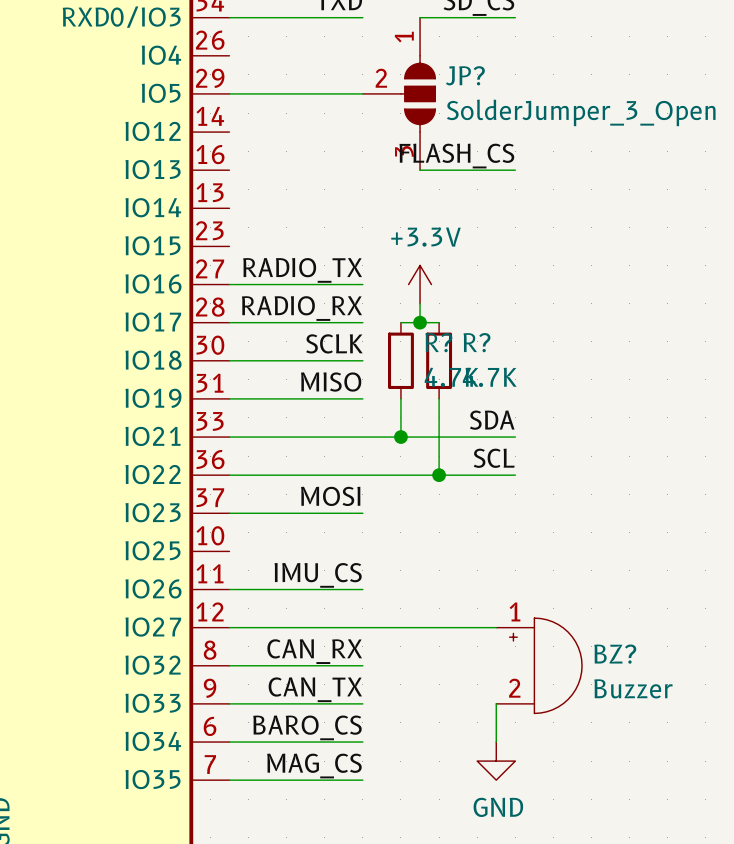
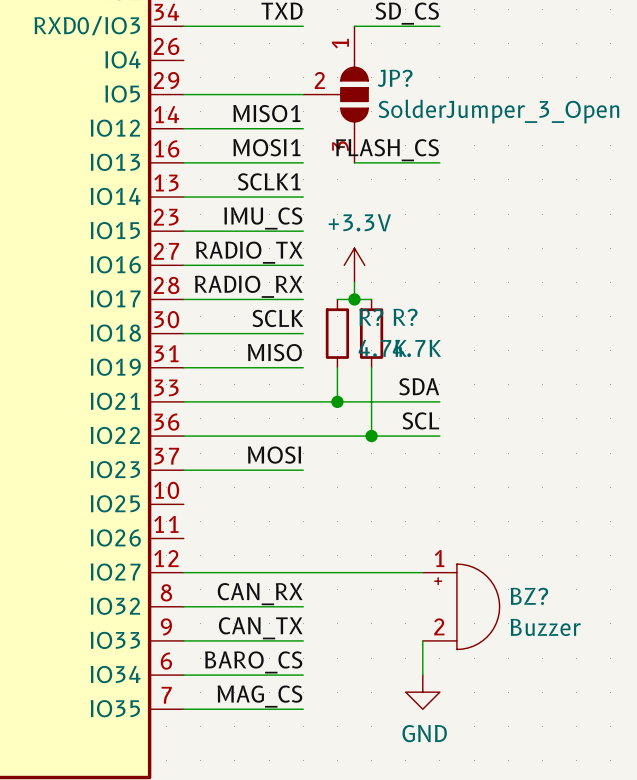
label: none -> MISO1 (266, 113)
wire: none -> (183, 128) (303, 128)
label: none -> MOSI1 (266, 147)
wire: none -> (183, 162) (303, 162)
label: none -> SCLK1 (269, 181)
wire: none -> (183, 197) (303, 197)
label position: IMU_CS (318, 575) -> IMU_CS (263, 218)
wire: (229, 589) (362, 589) -> (183, 231) (303, 231)

